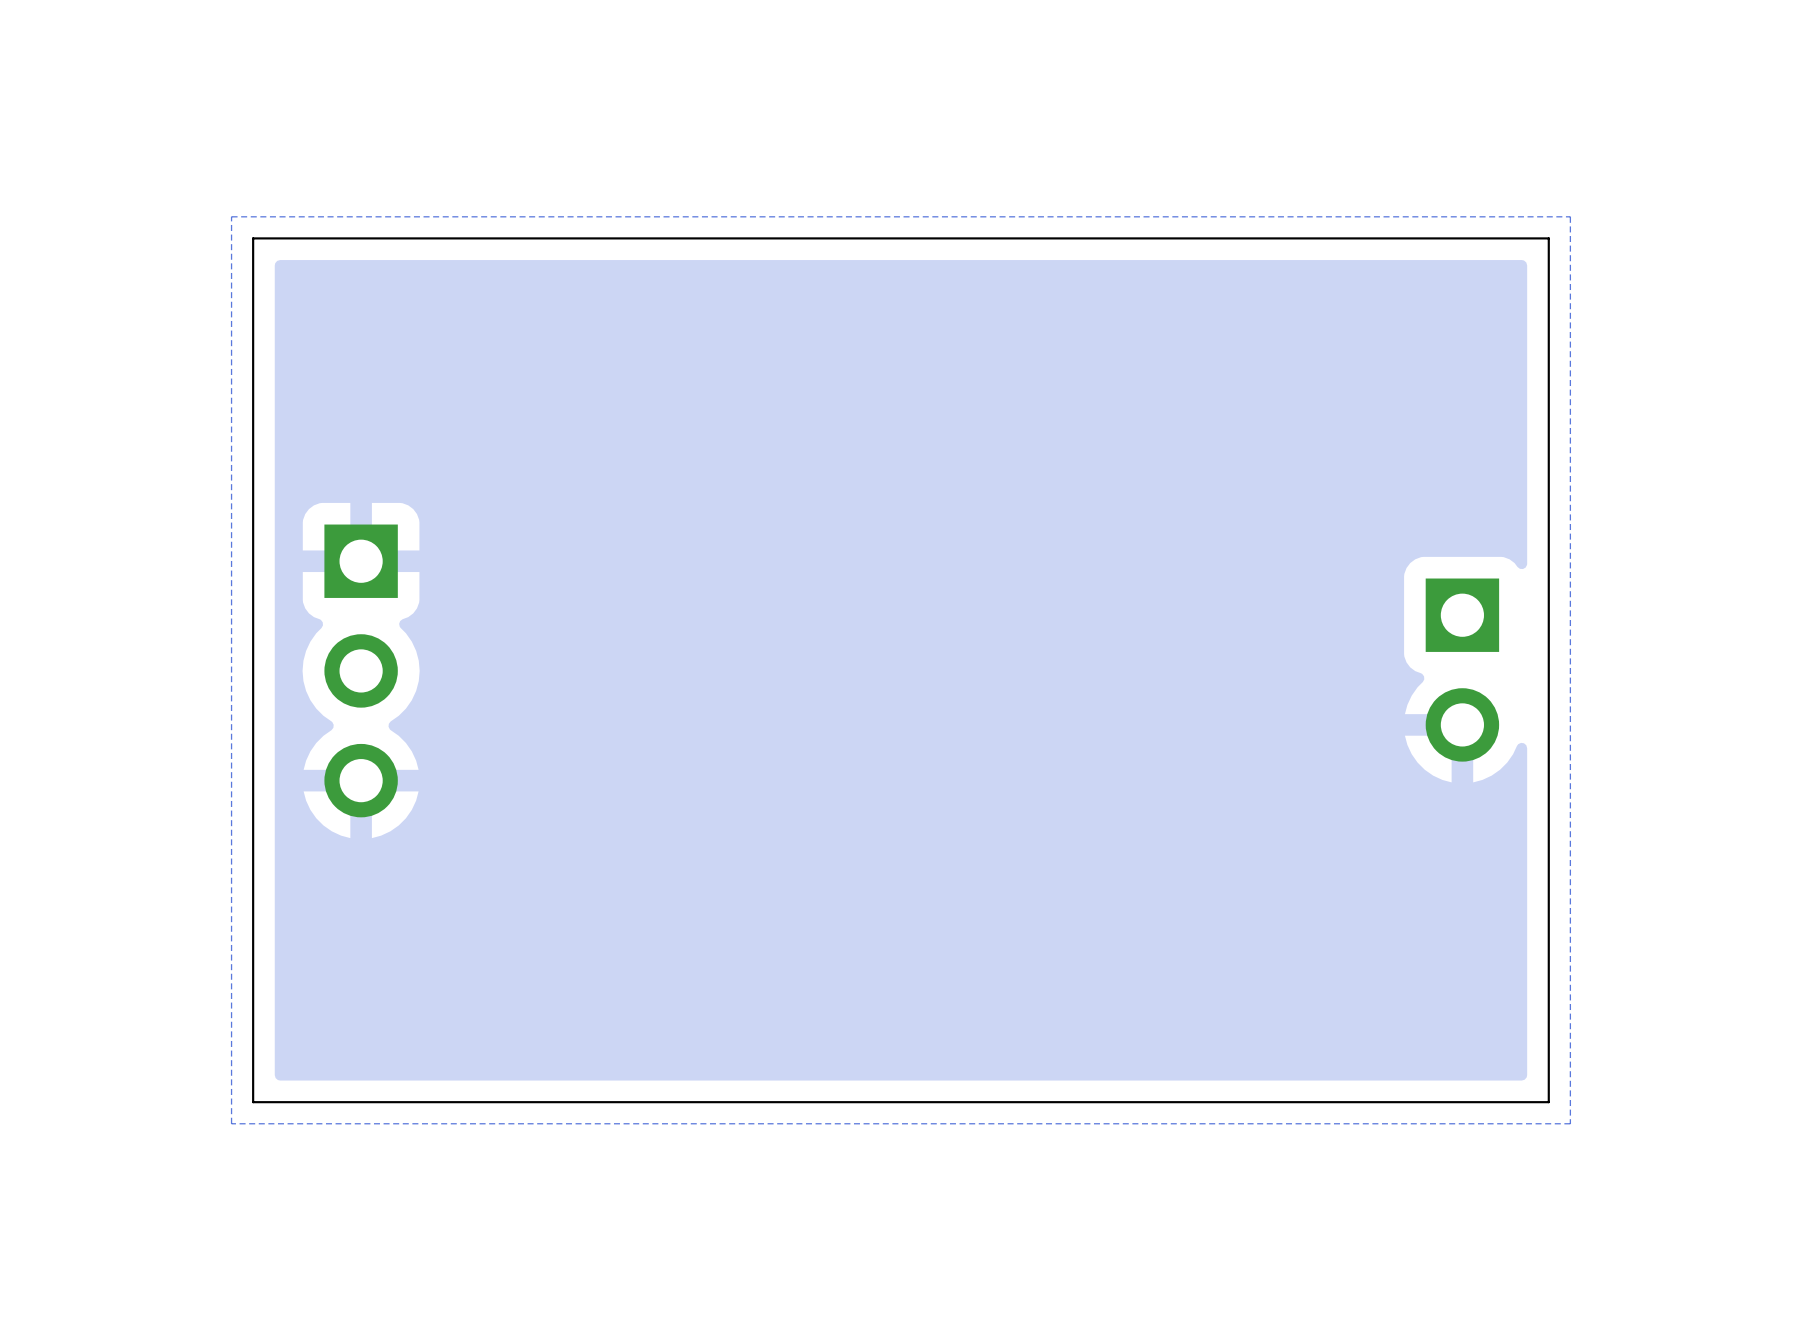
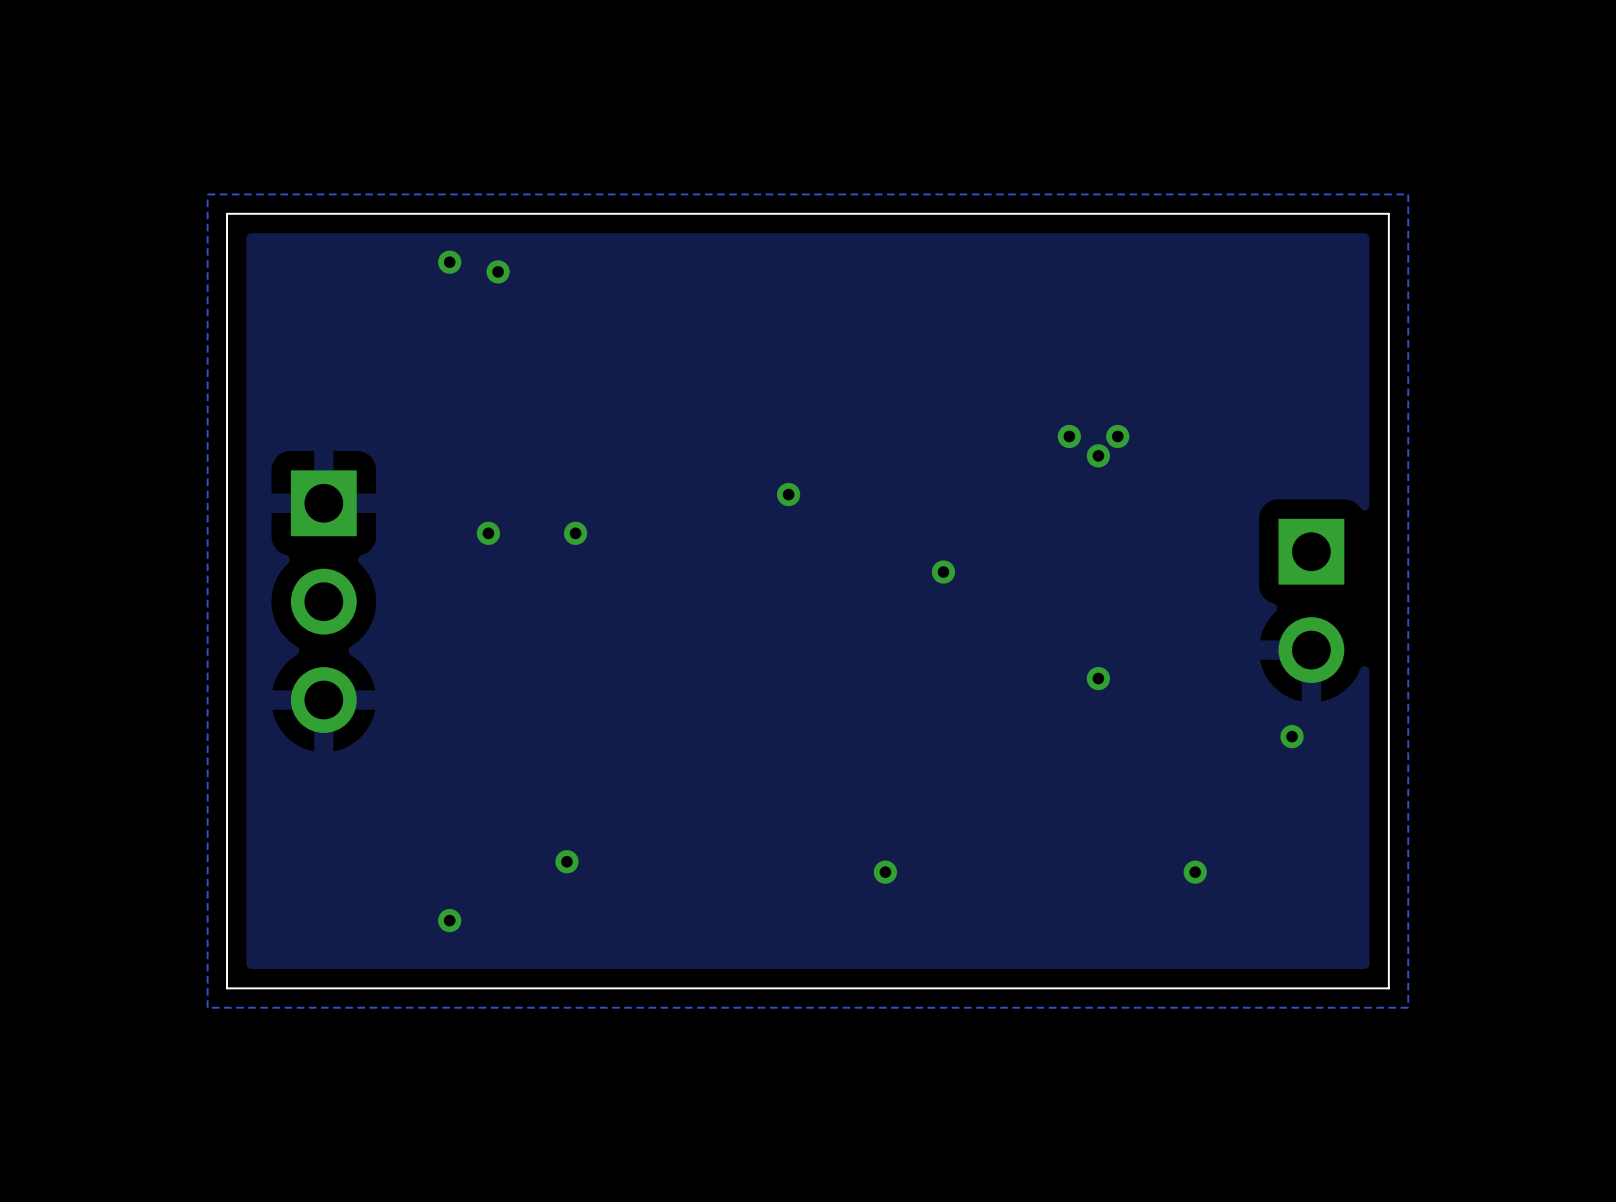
via: none -> (449, 262)
via: none -> (498, 271)
via: none -> (1069, 436)
via: none -> (1117, 436)
via: none -> (1098, 455)
via: none -> (788, 494)
via: none -> (488, 533)
via: none -> (575, 533)
via: none -> (943, 572)
via: none -> (1098, 678)
via: none -> (1292, 736)
via: none -> (566, 861)
via: none -> (885, 872)
via: none -> (1195, 872)
via: none -> (449, 920)

